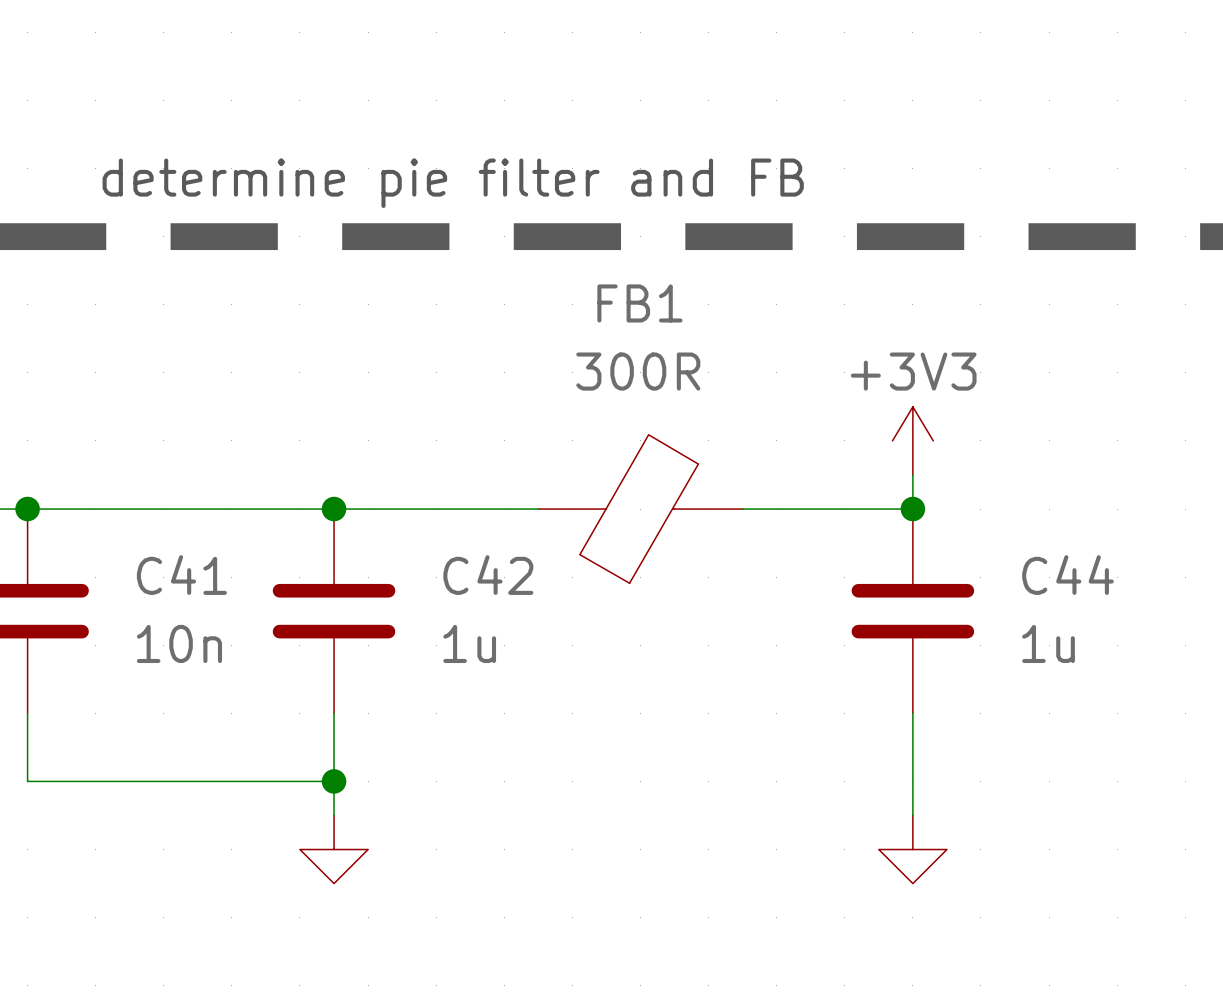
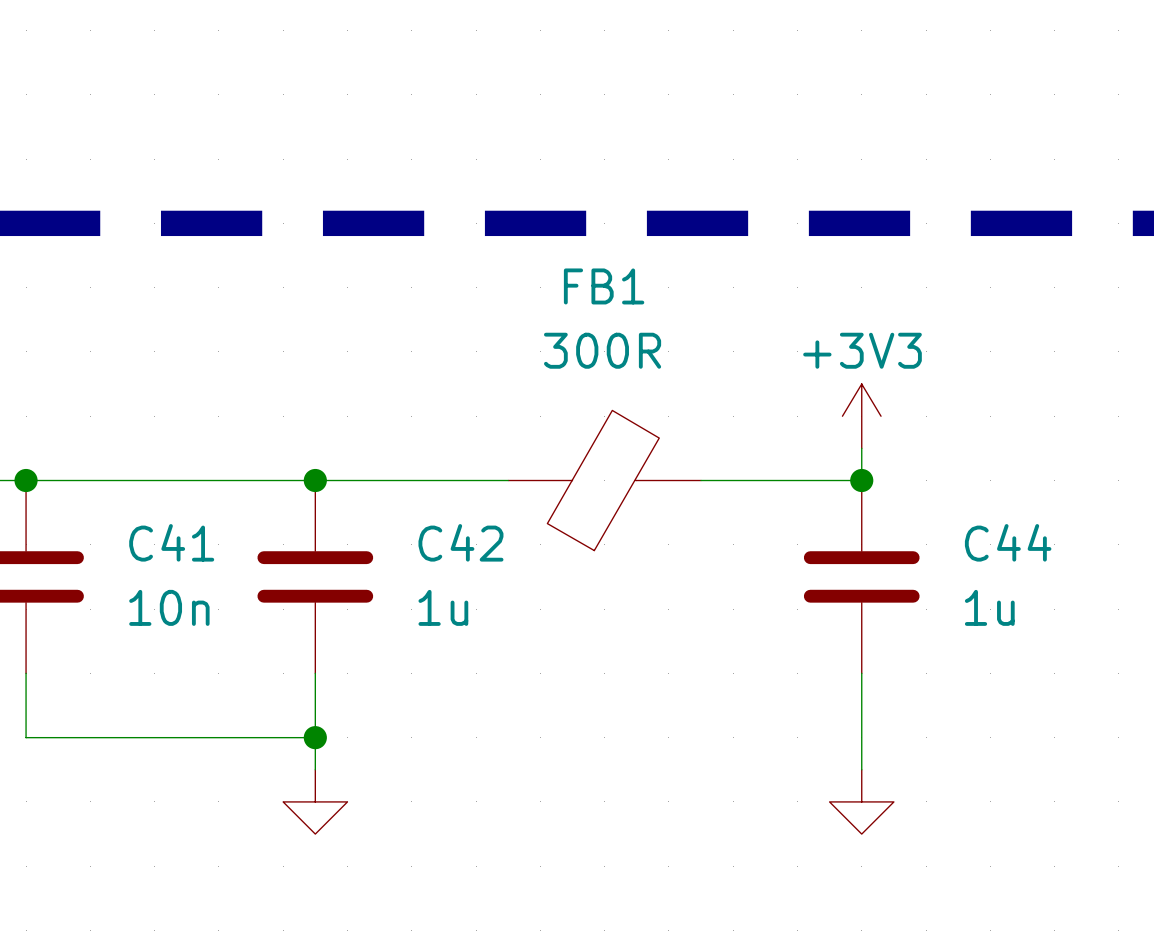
text: determine pie filter and FB (453, 183) -> none

